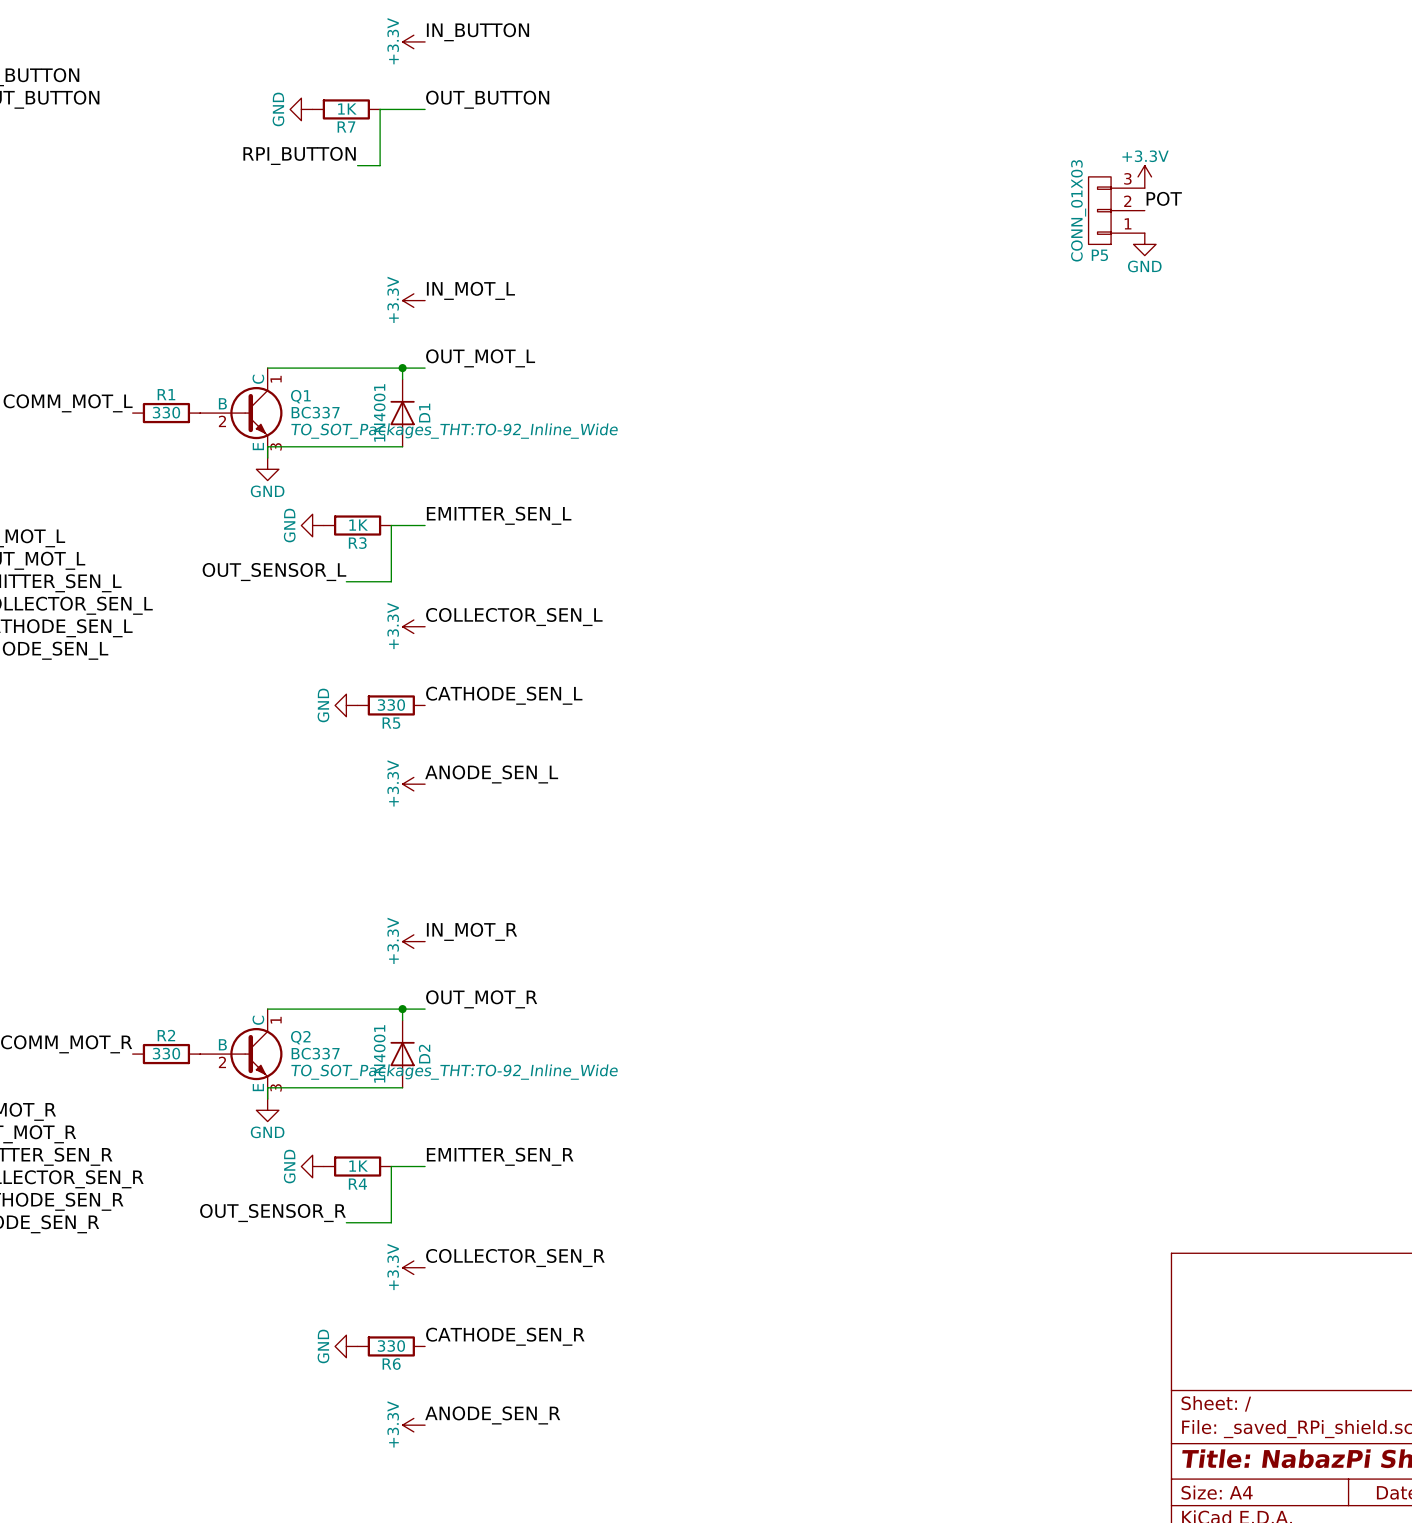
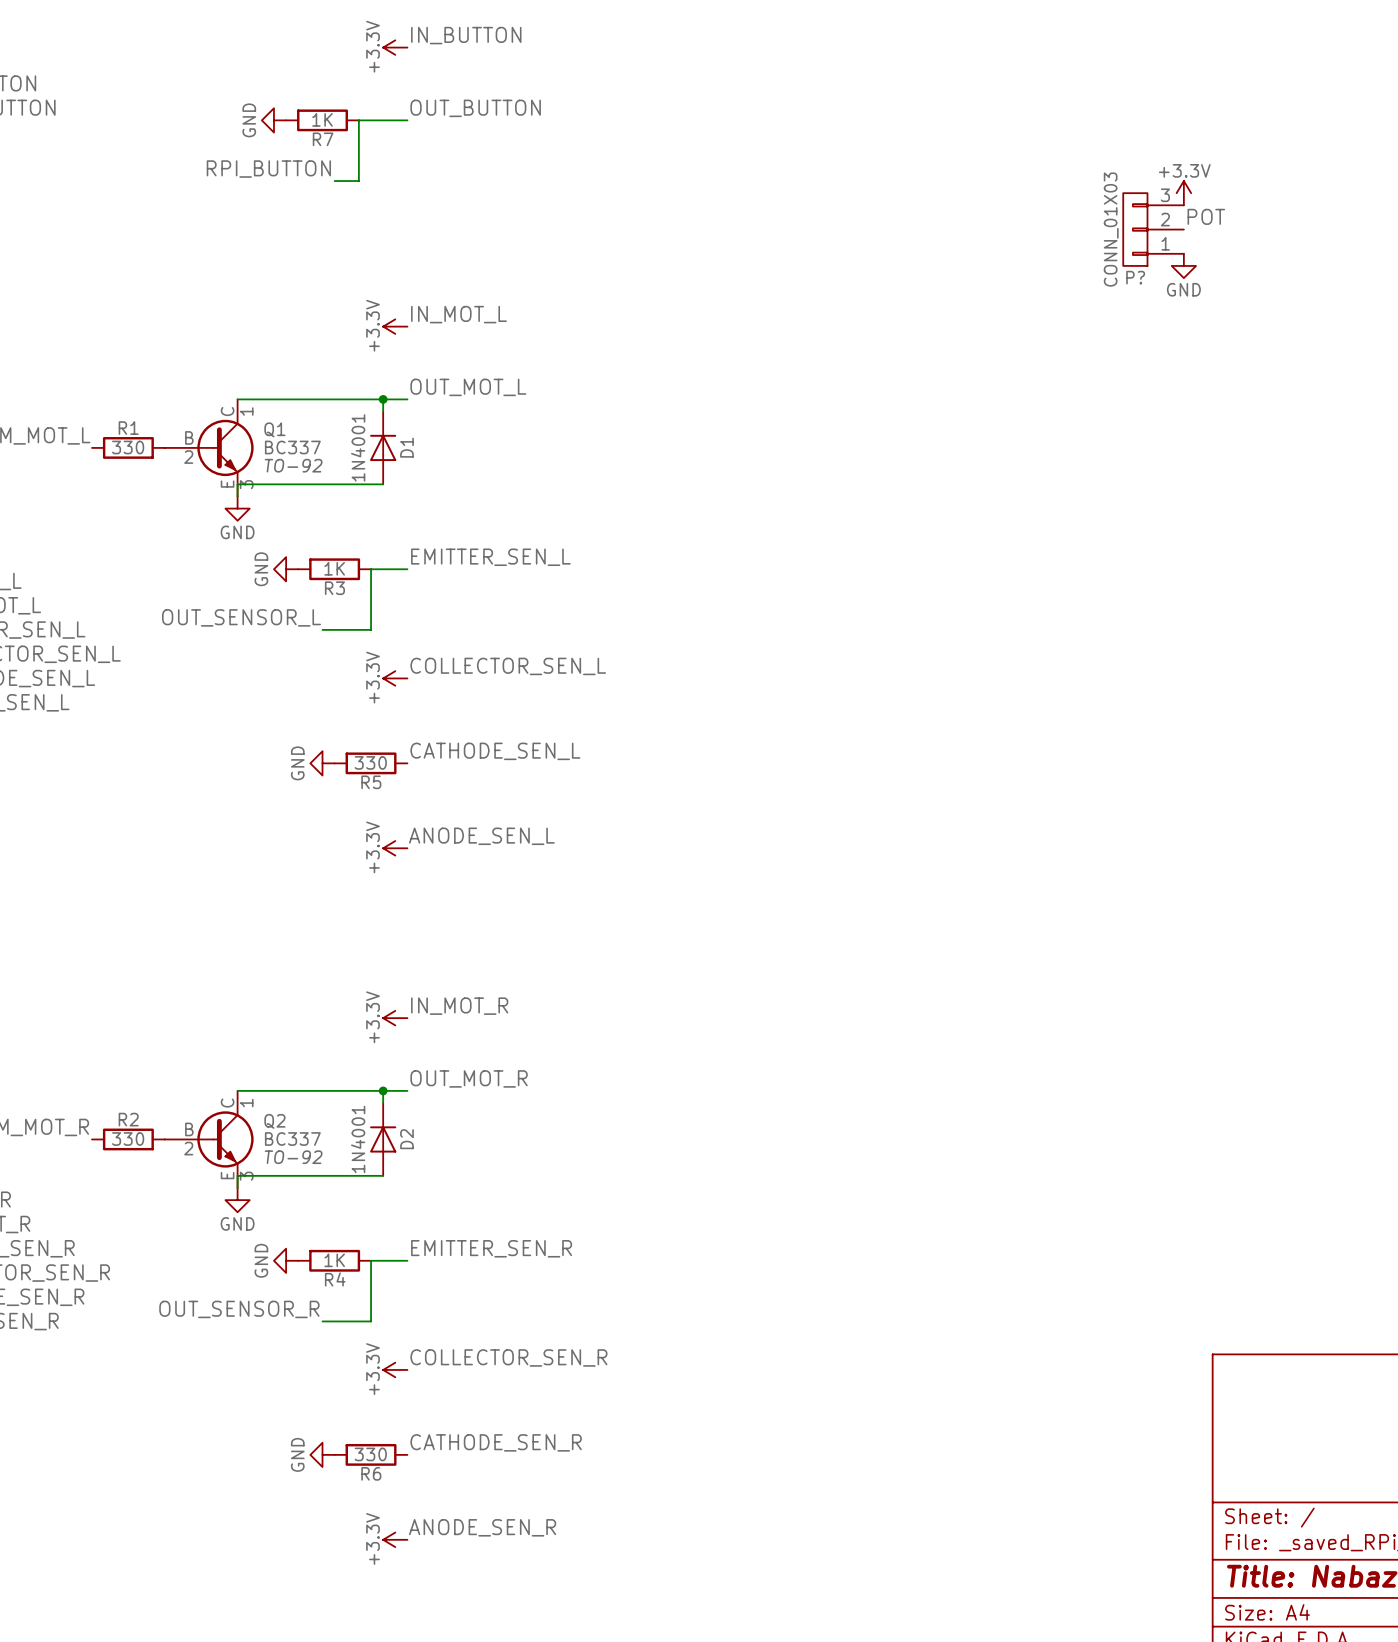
P5 name: P5 (1099, 255) -> P? (1135, 277)
Q1 text: TO_SOT_Packages_THT:TO-92_Inline_Wide (454, 431) -> TO-92 (293, 465)
Q2 text: TO_SOT_Packages_THT:TO-92_Inline_Wide (454, 1072) -> TO-92 (293, 1157)

